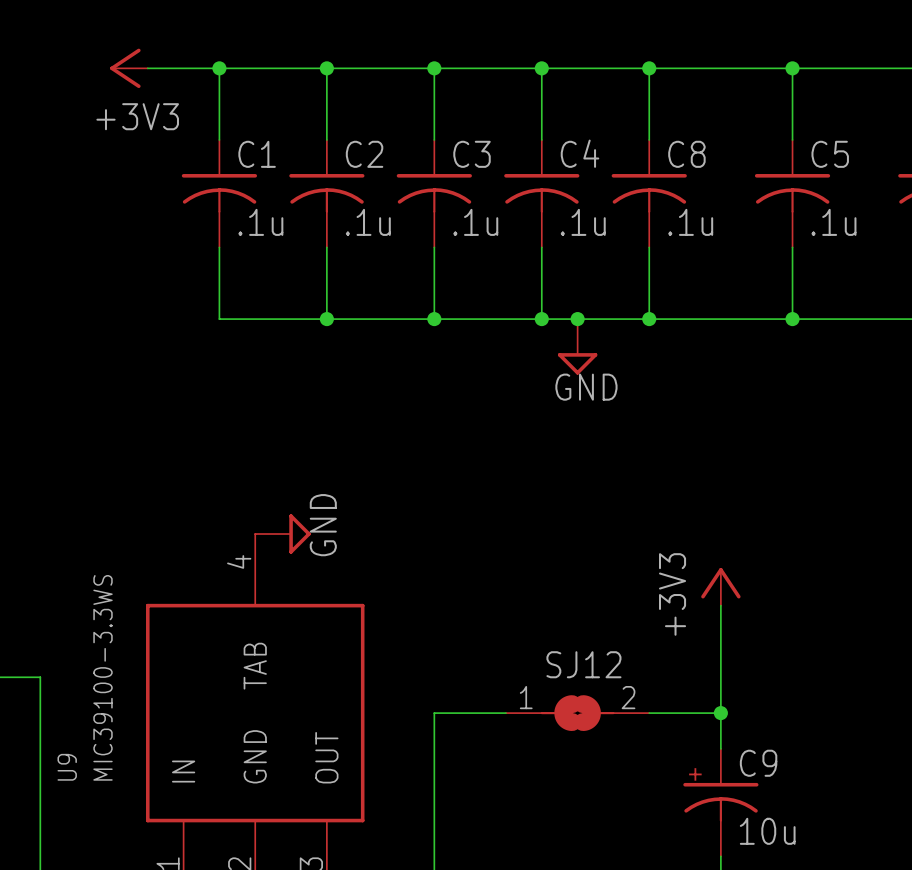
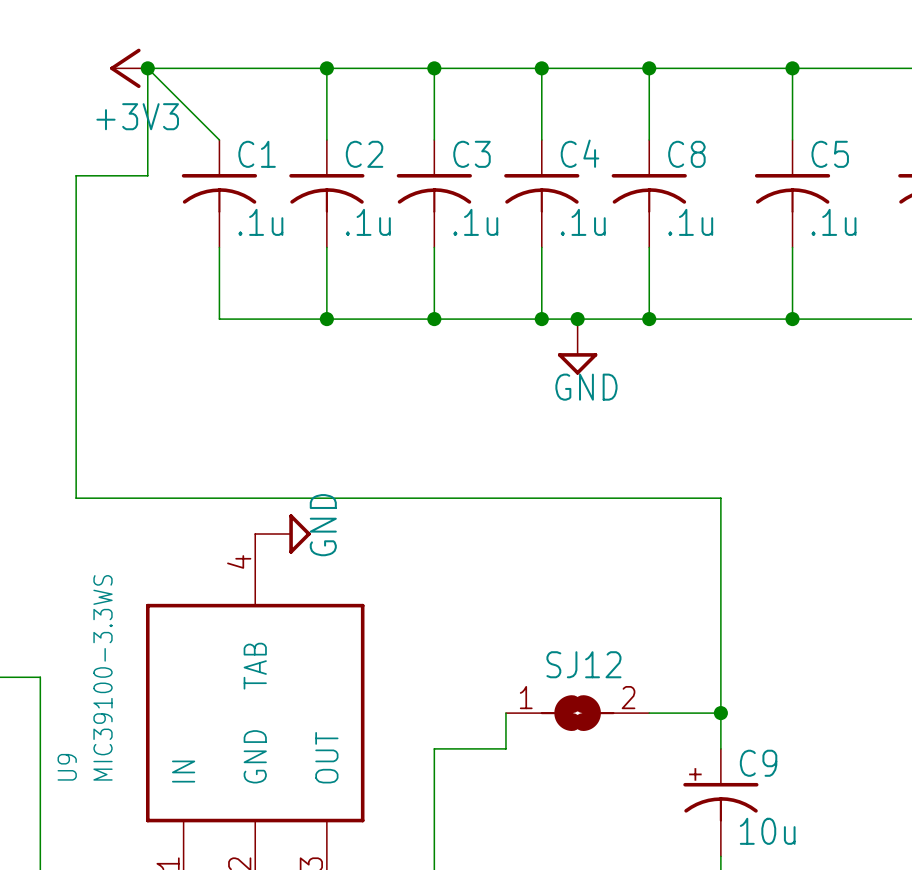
wire: (219, 68) (219, 139) -> (720, 605) (720, 498) (76, 498) (76, 175) (147, 175) (147, 68) (219, 139)
junction position: (219, 68) -> (147, 68)
power symbol: +3V3 (720, 586) -> none
wire: (505, 713) (434, 713) (434, 748) -> (505, 713) (505, 748) (434, 748)

